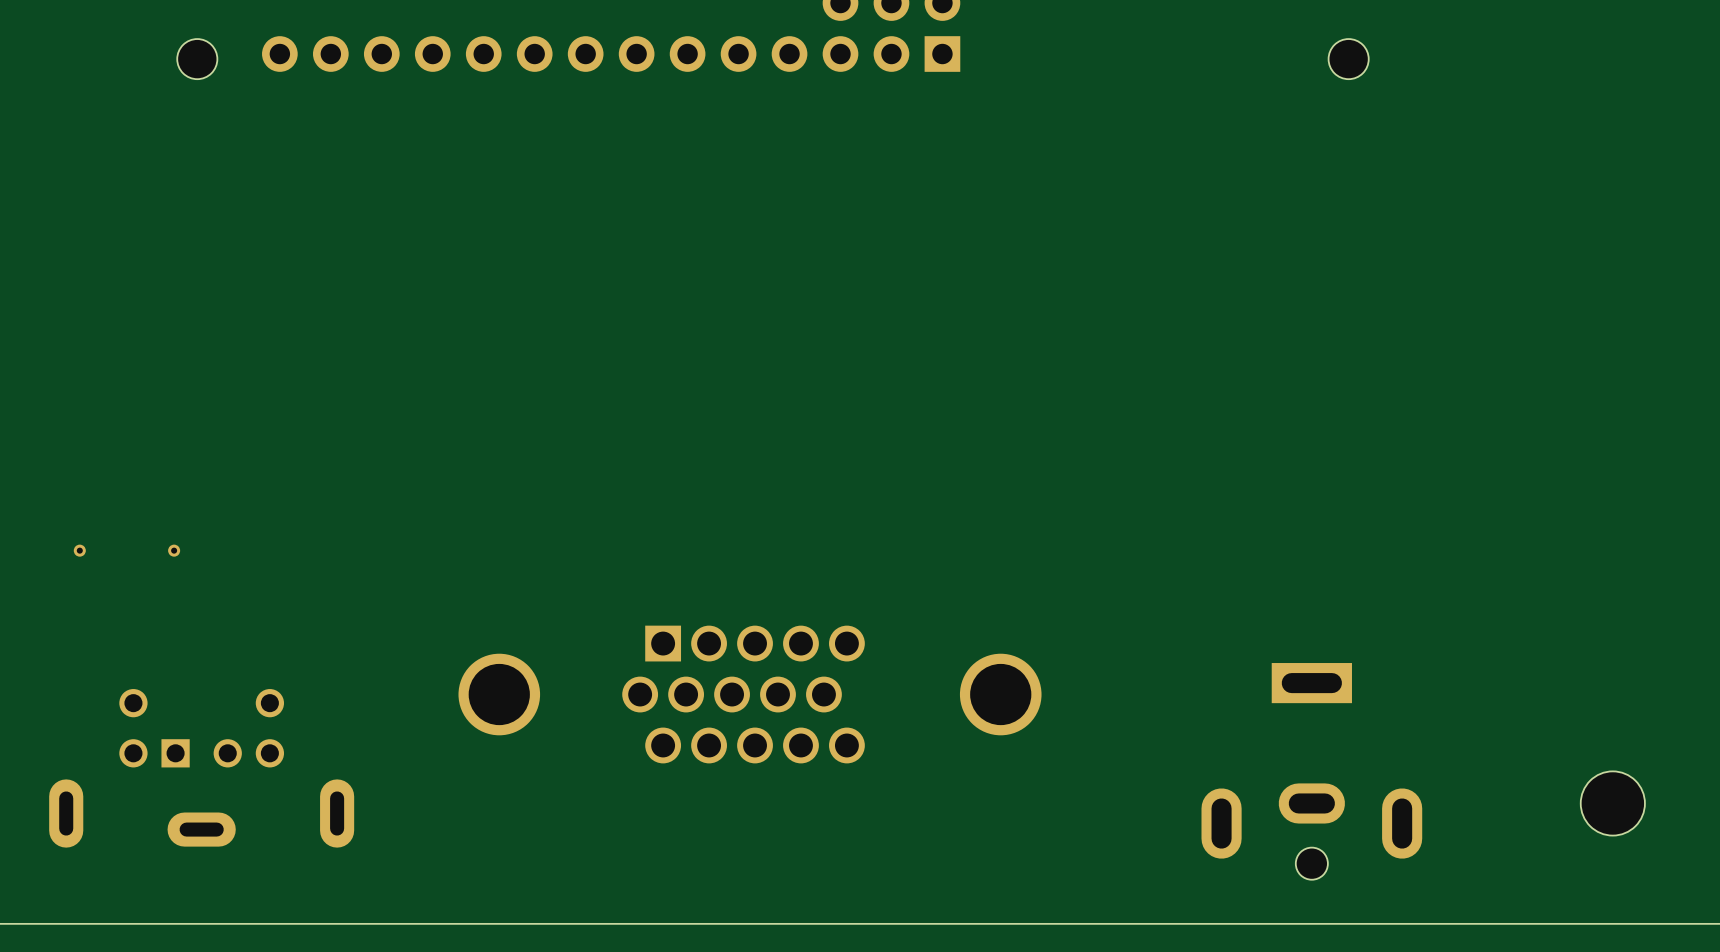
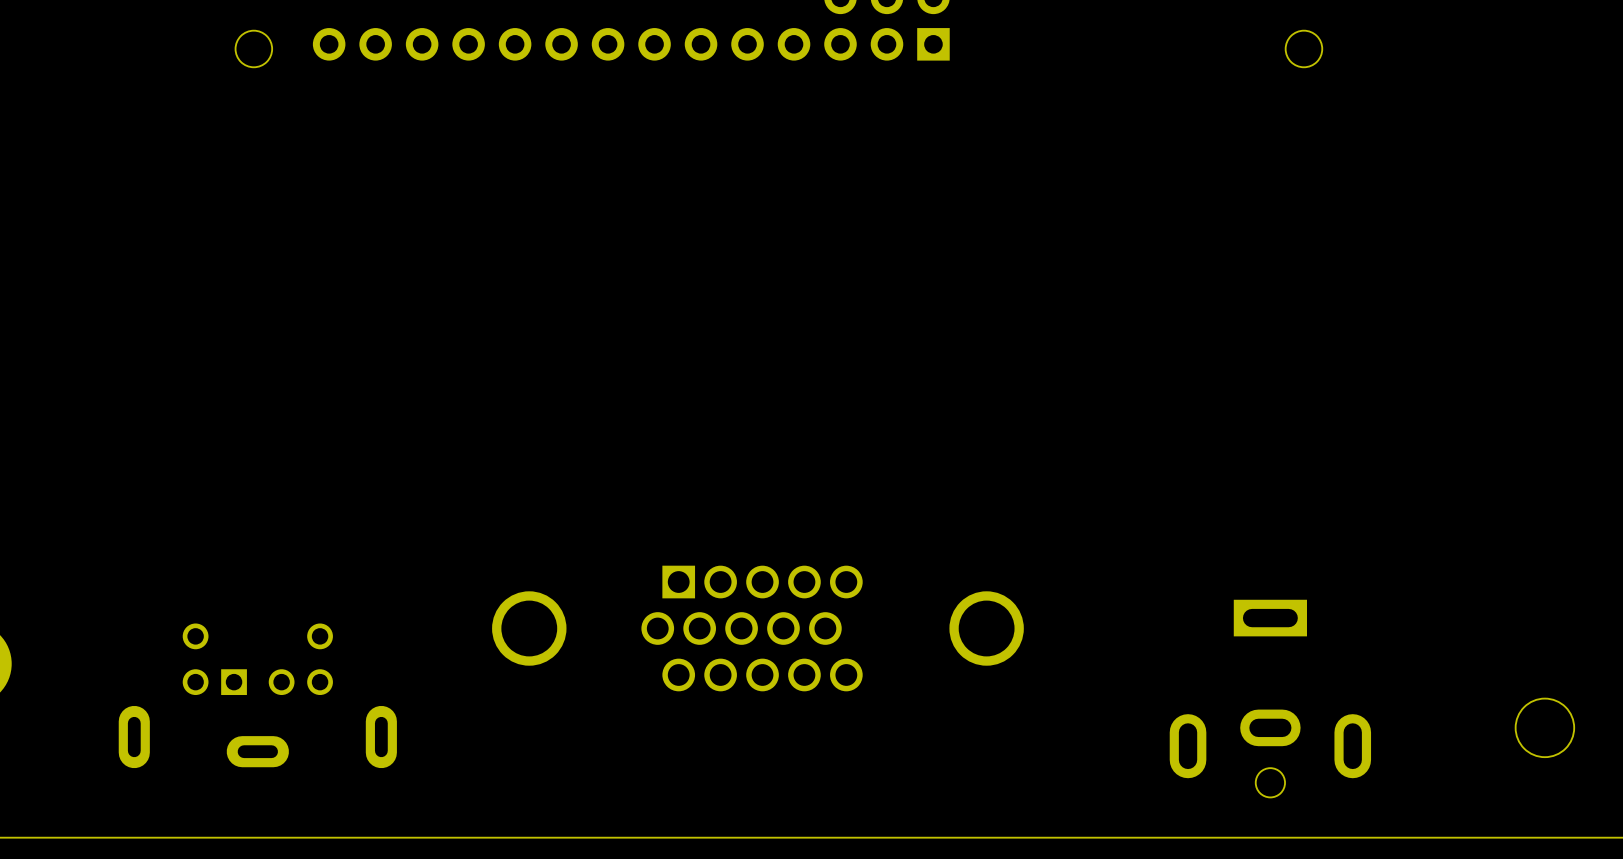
part: (79, 550) -> none
part: (174, 550) -> none

